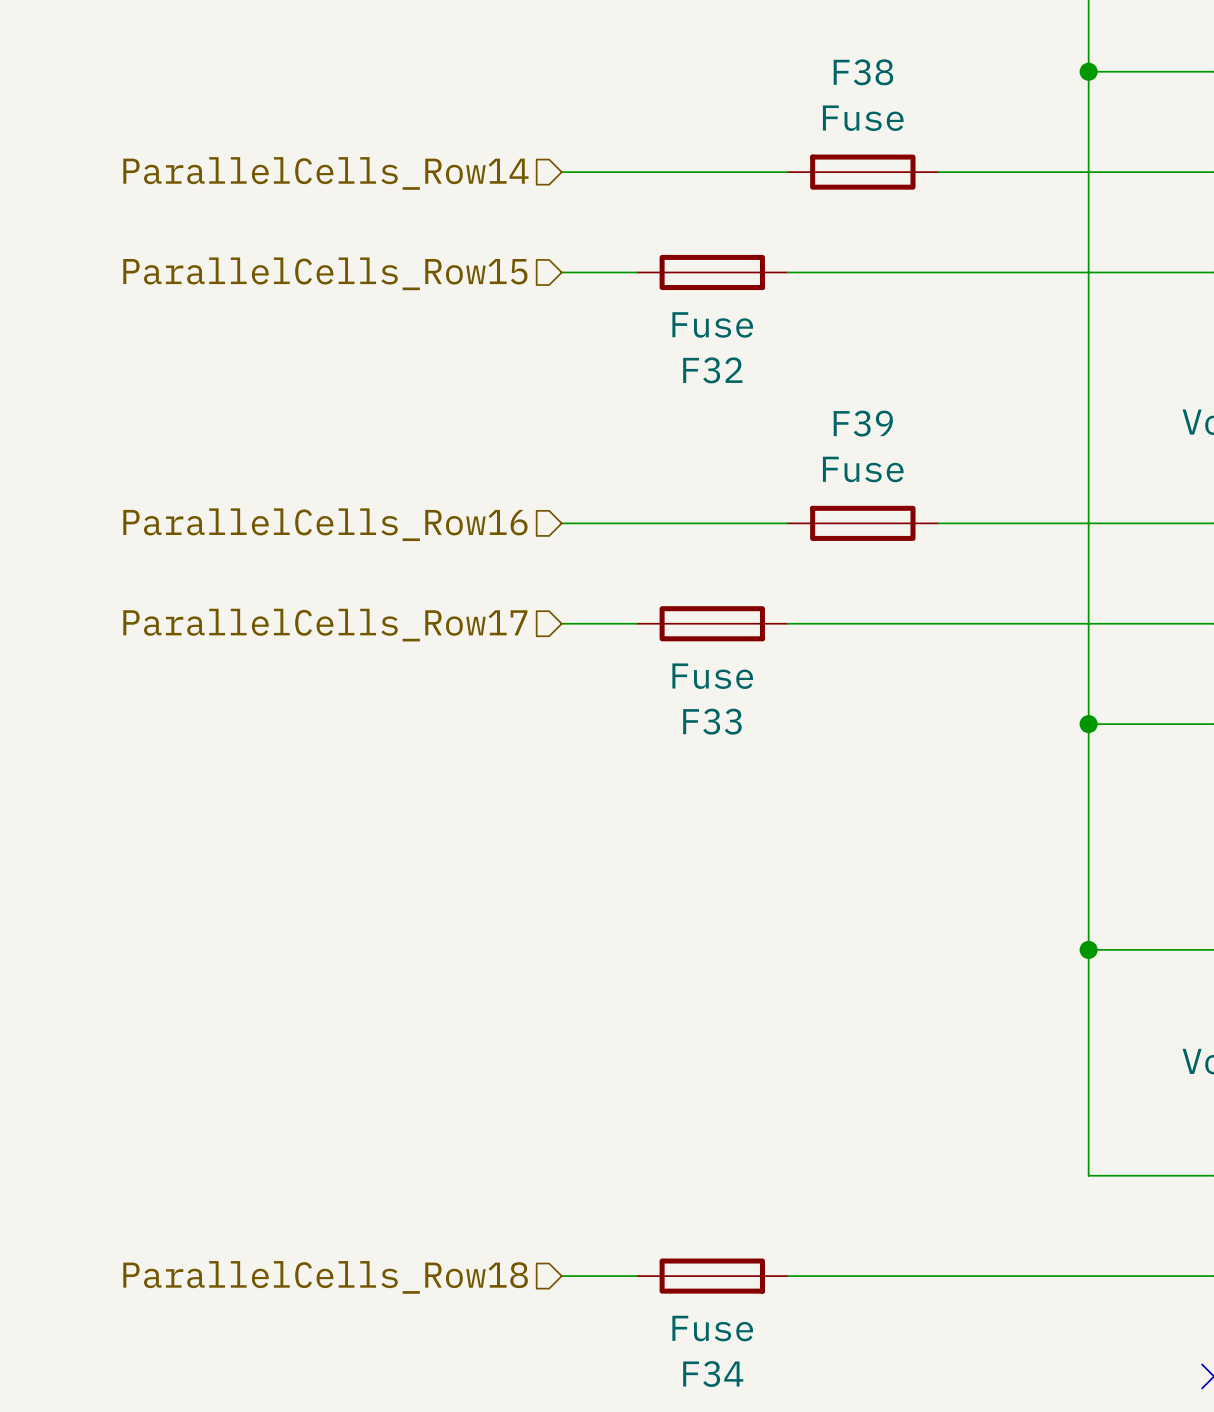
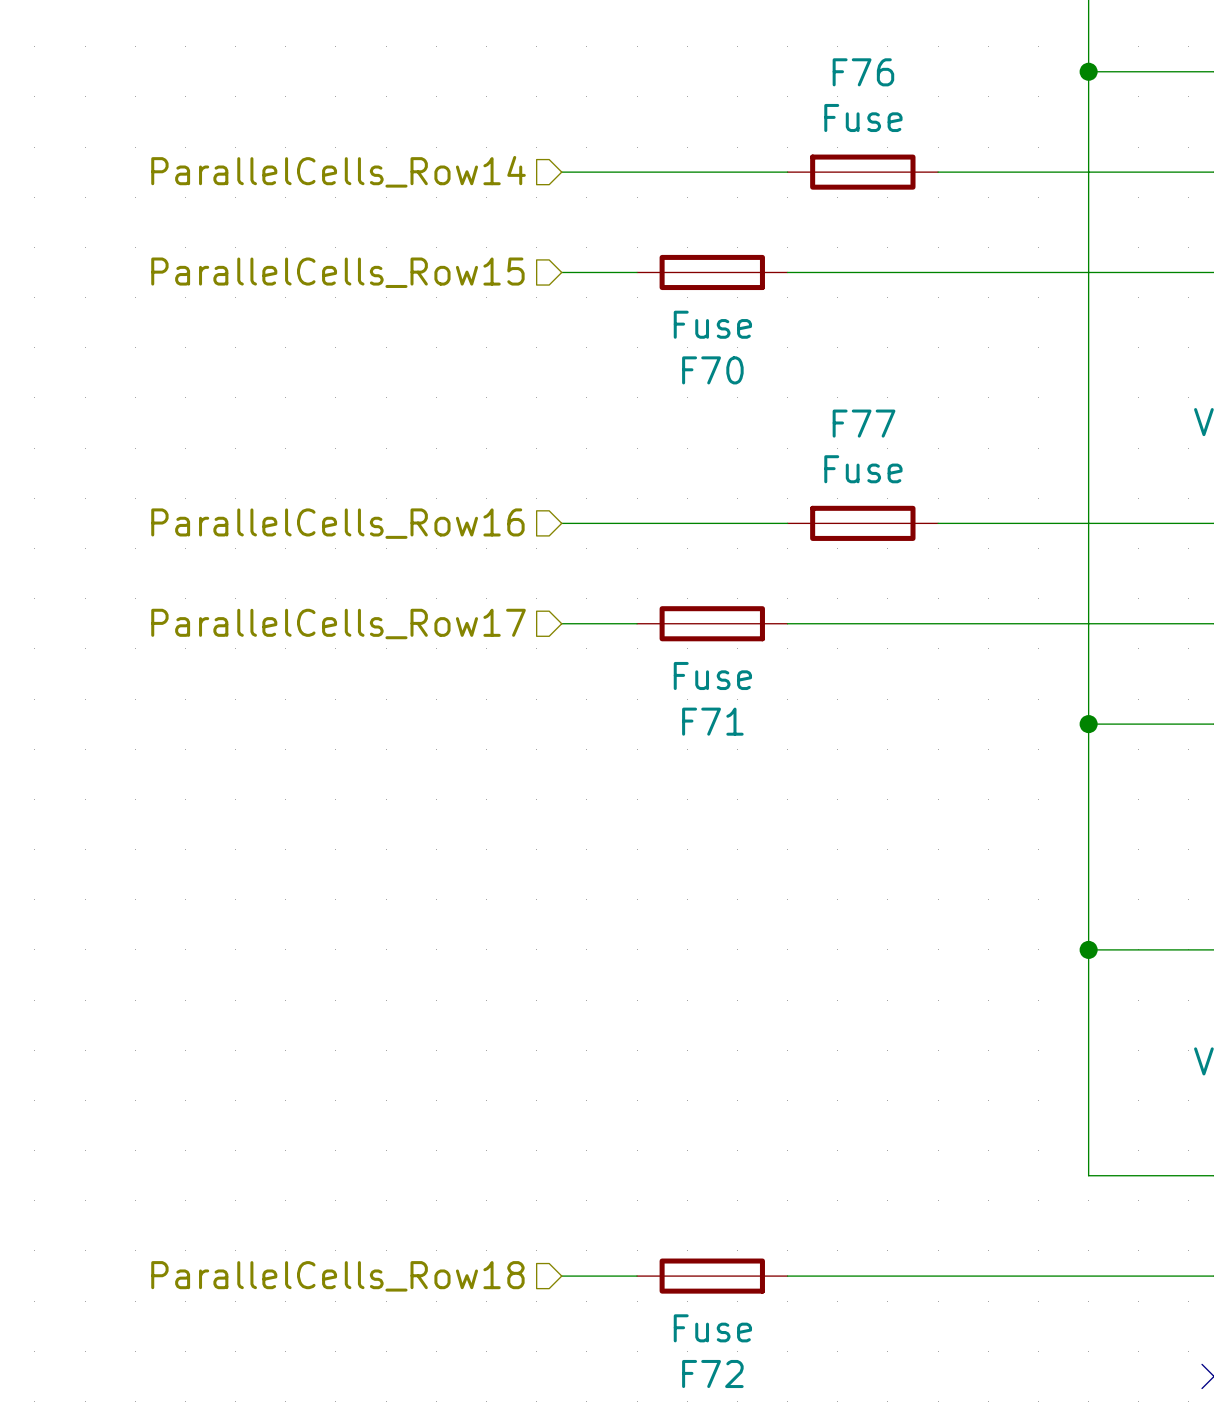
F38 name: F38 (863, 72) -> F76 (863, 72)
F32 name: F32 (712, 370) -> F70 (712, 370)
F39 name: F39 (863, 423) -> F77 (864, 423)
F33 name: F33 (712, 721) -> F71 (712, 721)
F34 name: F34 (713, 1374) -> F72 (712, 1374)

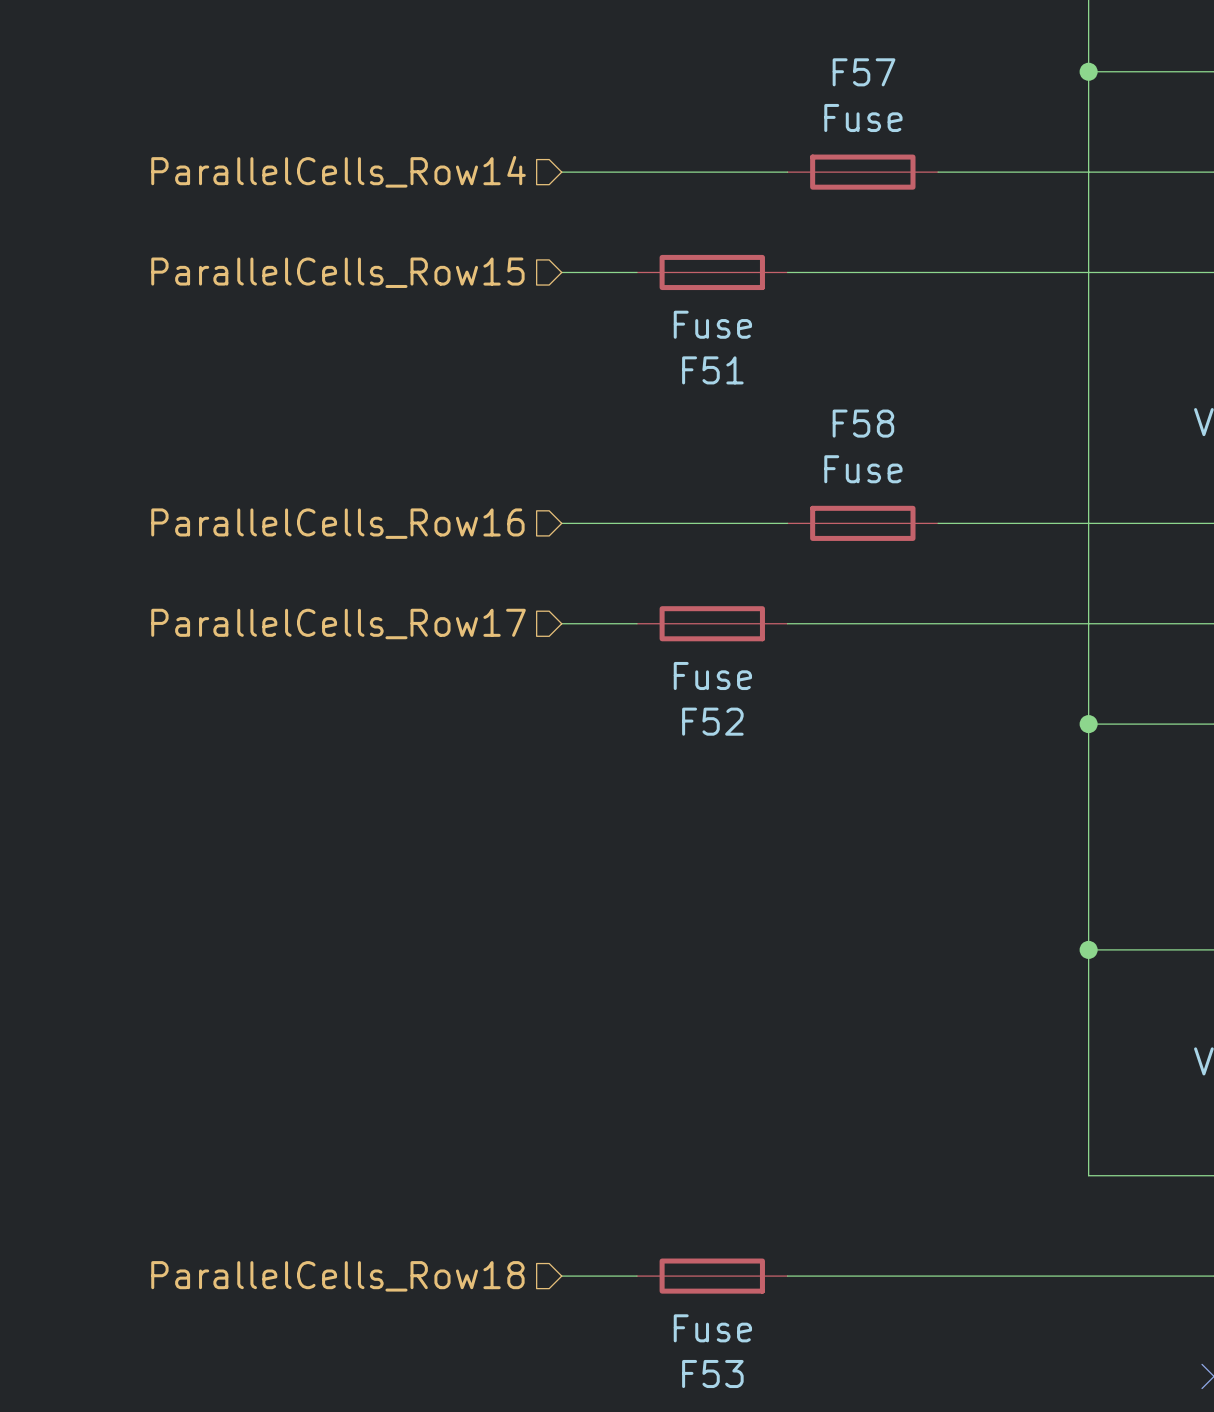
F76 name: F76 (863, 72) -> F57 (864, 72)
F70 name: F70 (712, 370) -> F51 (712, 370)
F77 name: F77 (864, 423) -> F58 (863, 423)
F71 name: F71 (712, 721) -> F52 (712, 721)
F72 name: F72 (712, 1374) -> F53 (712, 1374)

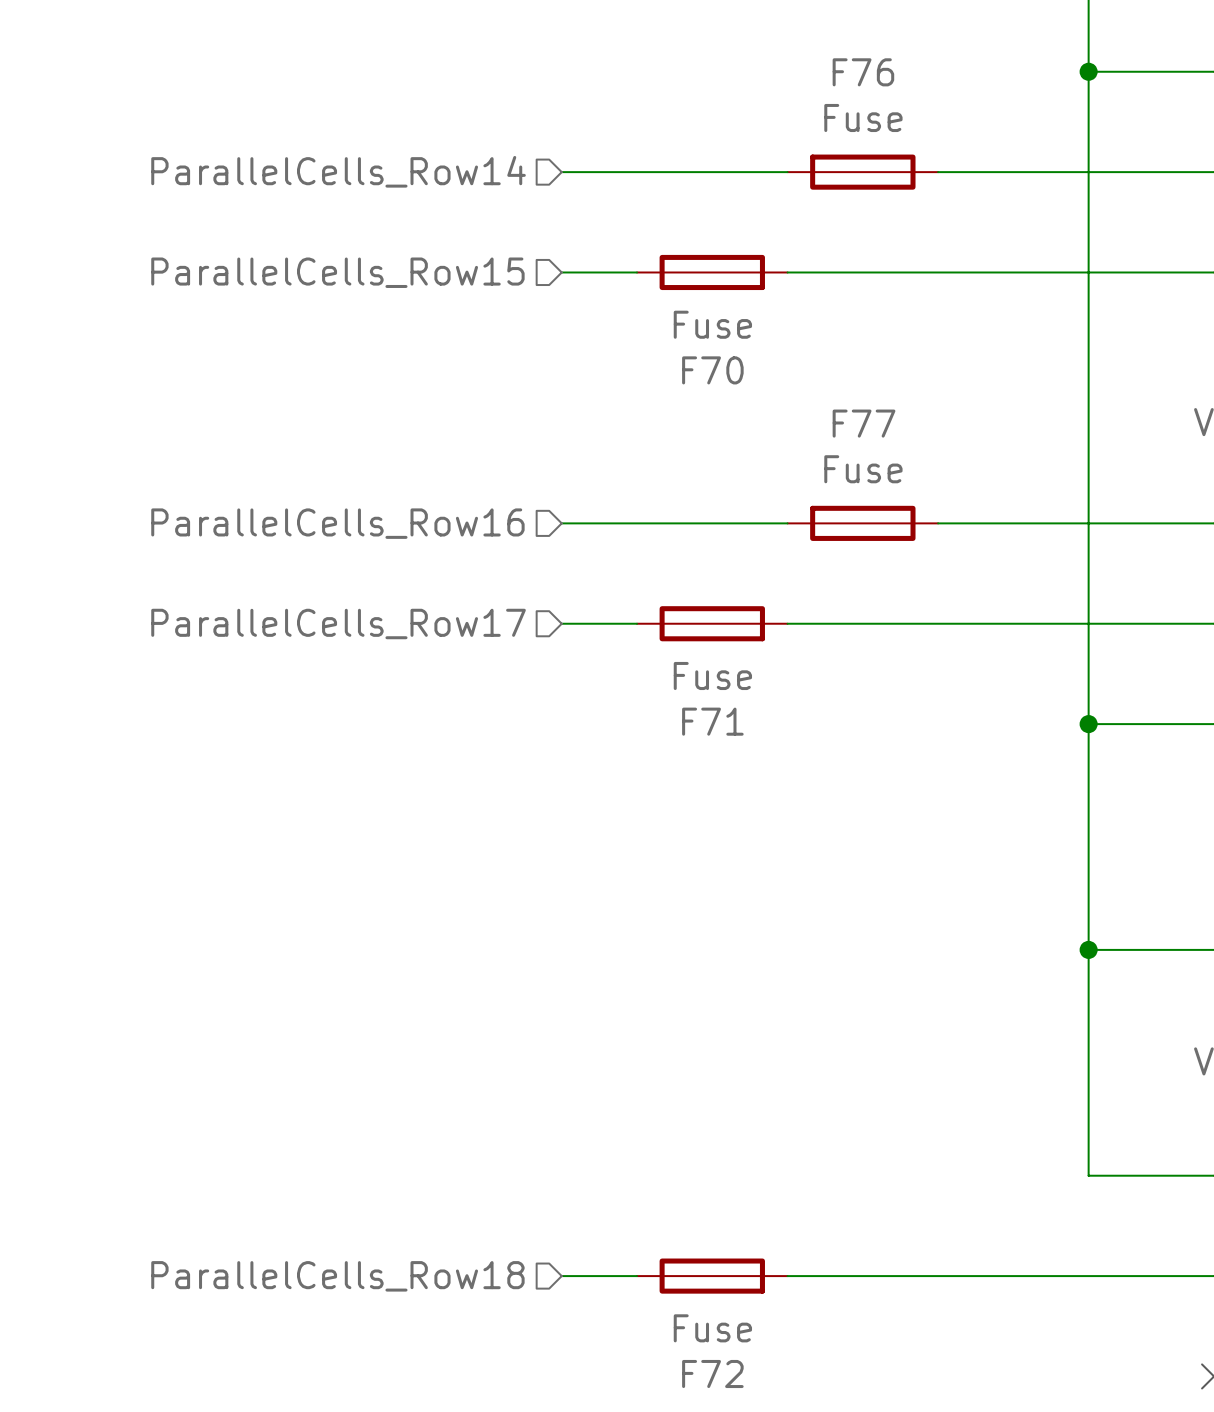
F57 name: F57 (864, 72) -> F76 (863, 72)
F51 name: F51 (712, 370) -> F70 (712, 370)
F58 name: F58 (863, 423) -> F77 (864, 423)
F52 name: F52 (712, 721) -> F71 (712, 721)
F53 name: F53 (712, 1374) -> F72 (712, 1374)

